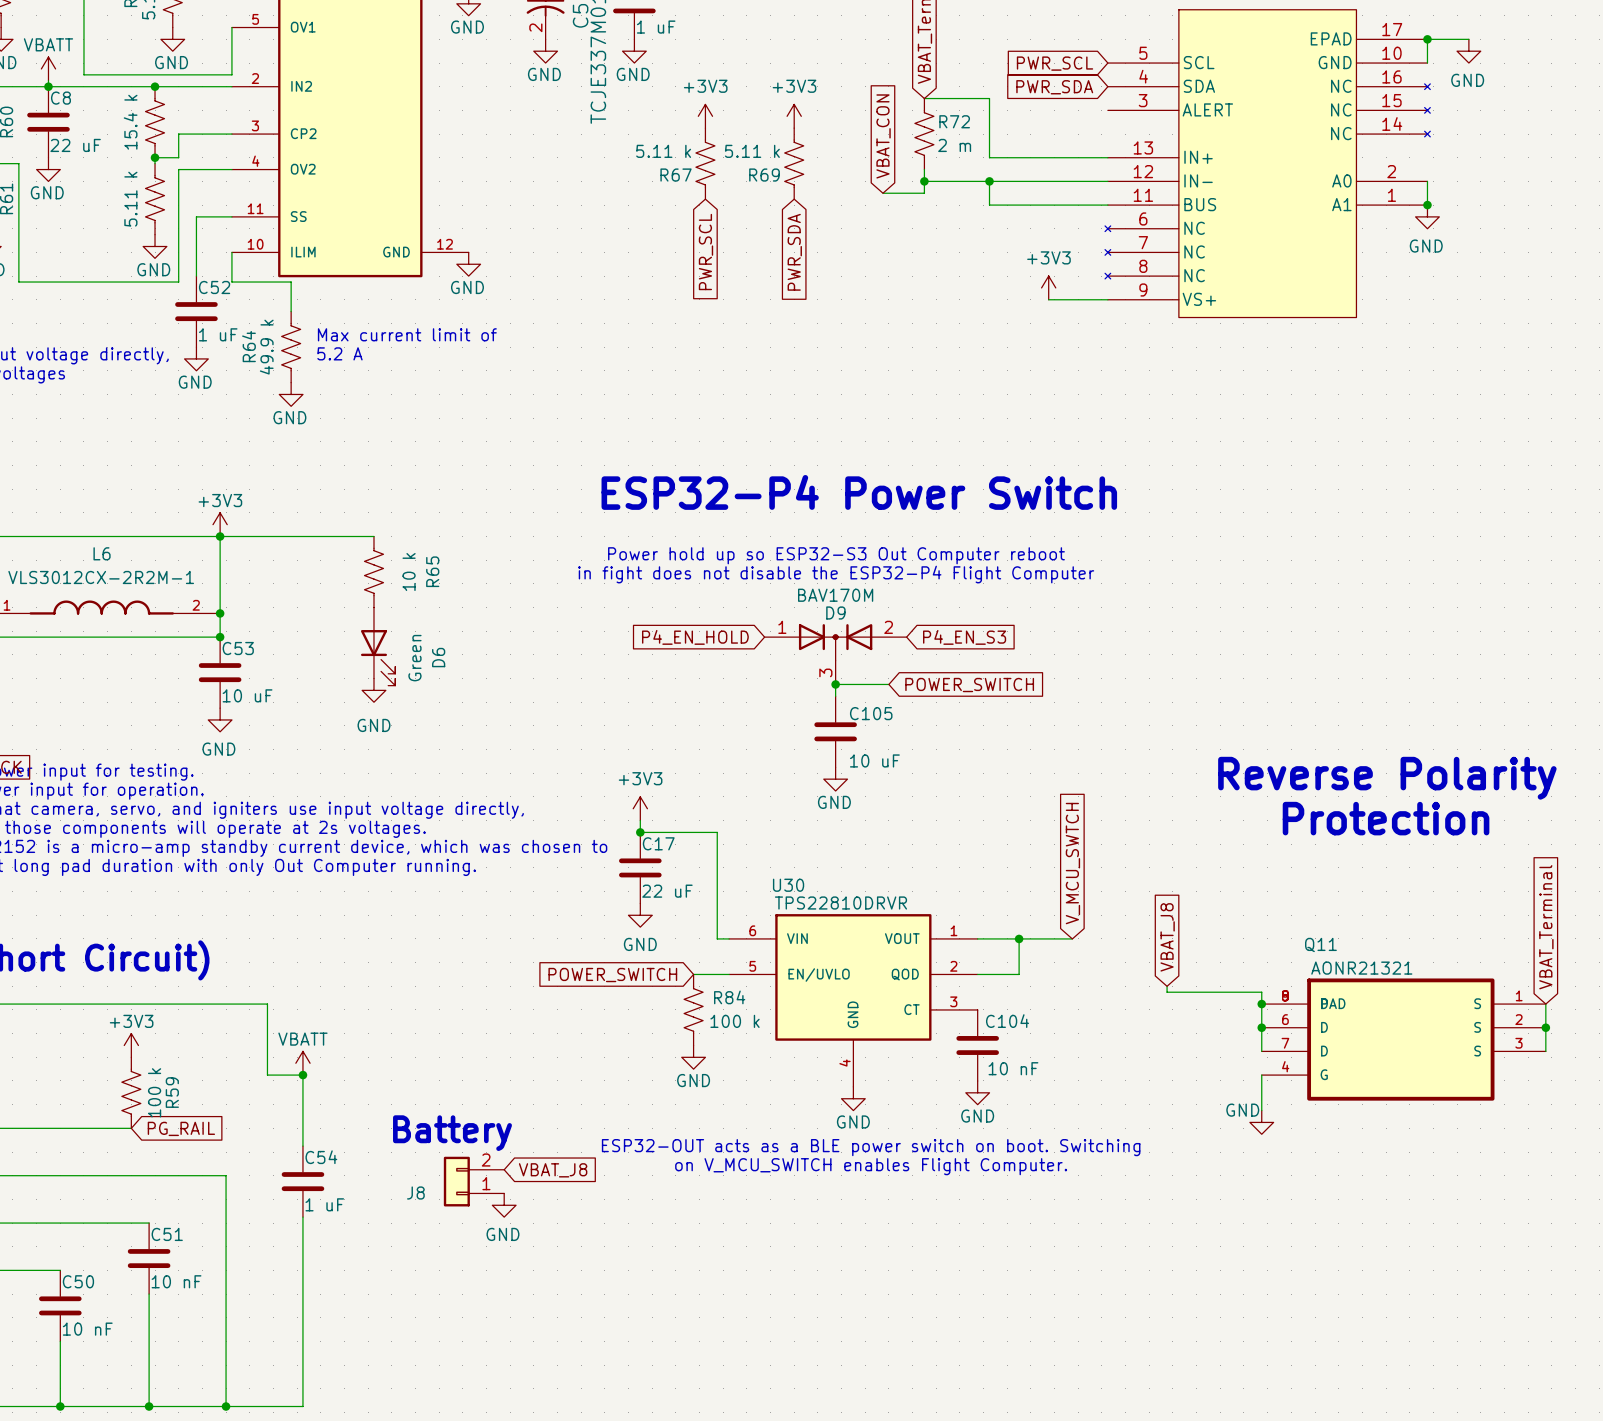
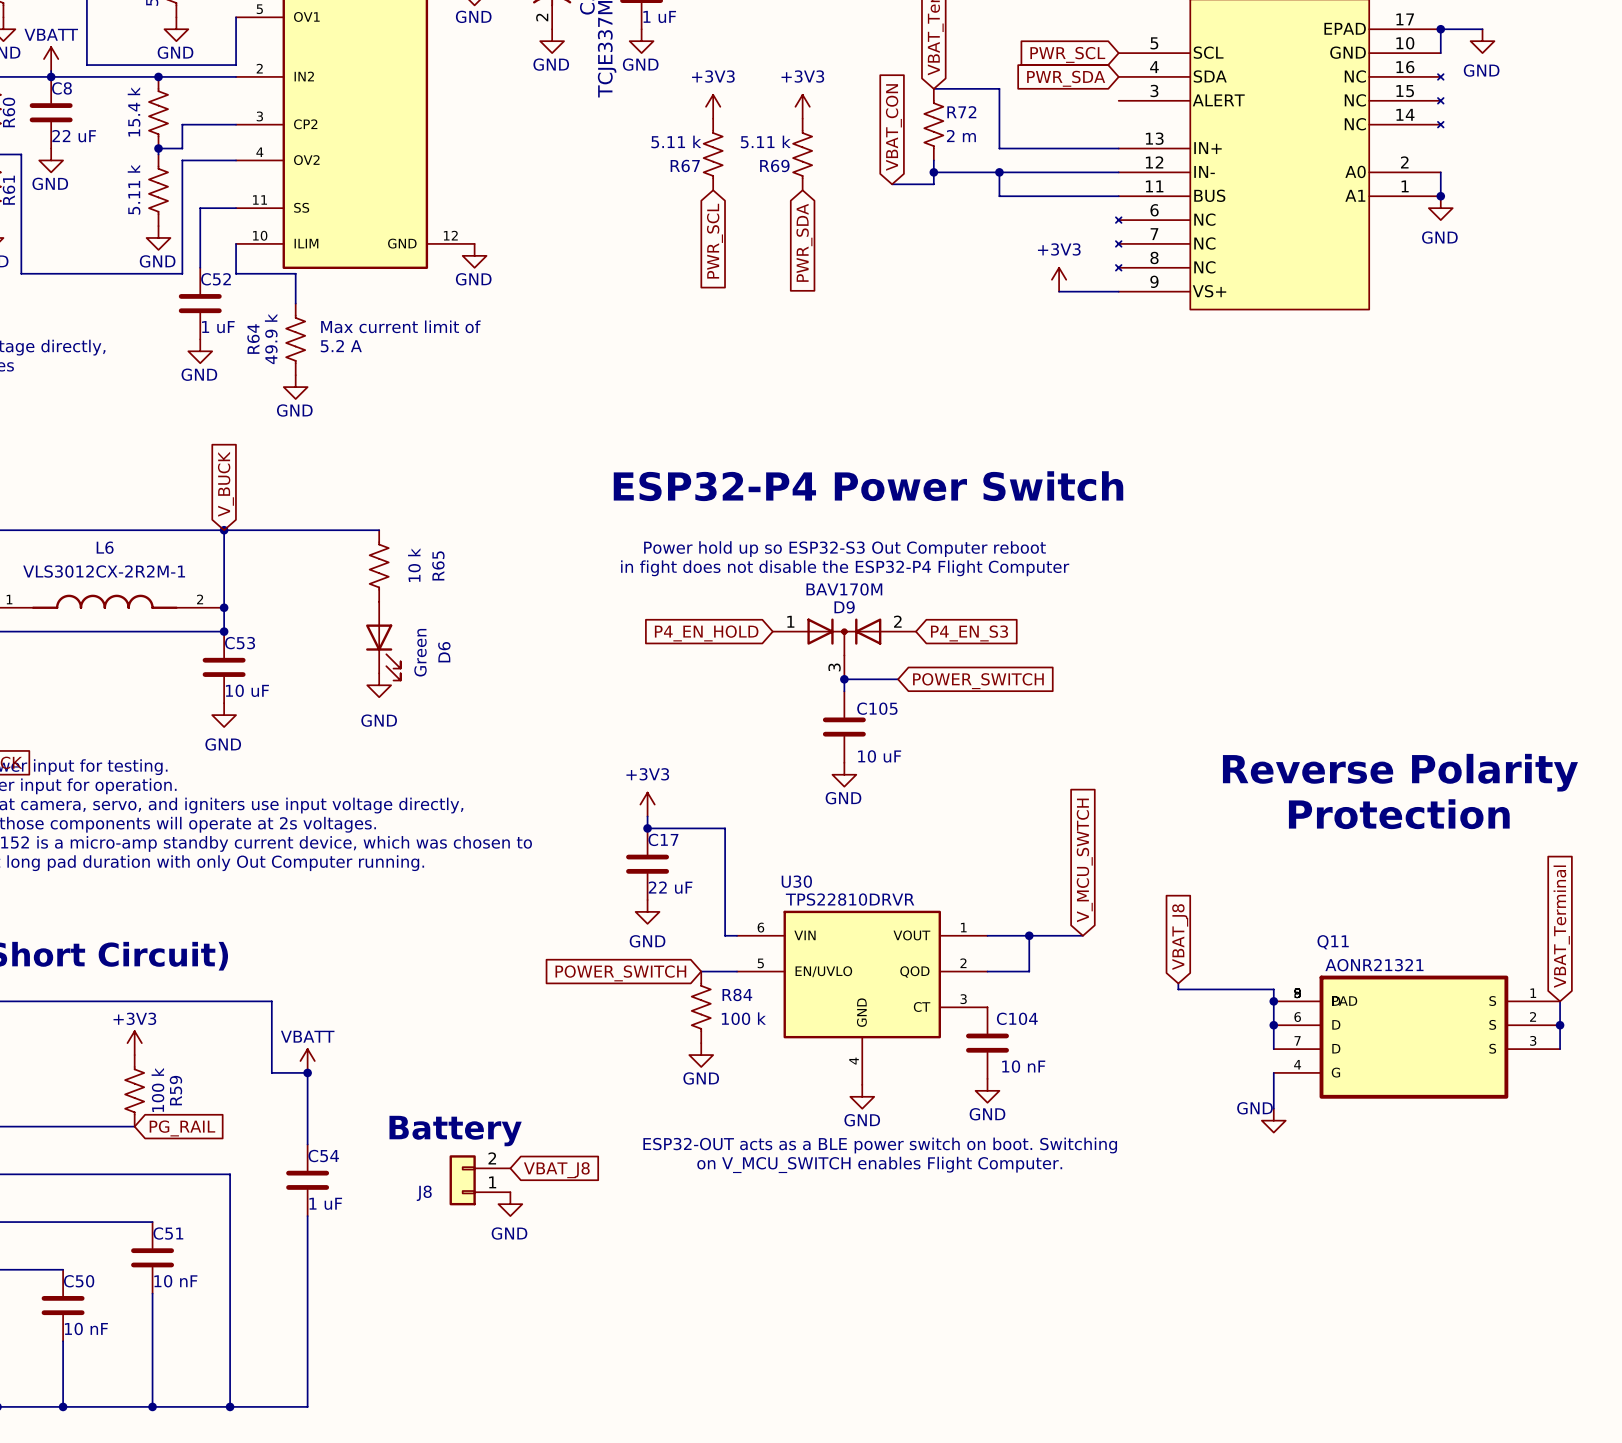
global label: none -> V_BUCK (225, 484)
power symbol: +3V3 (220, 524) -> none

